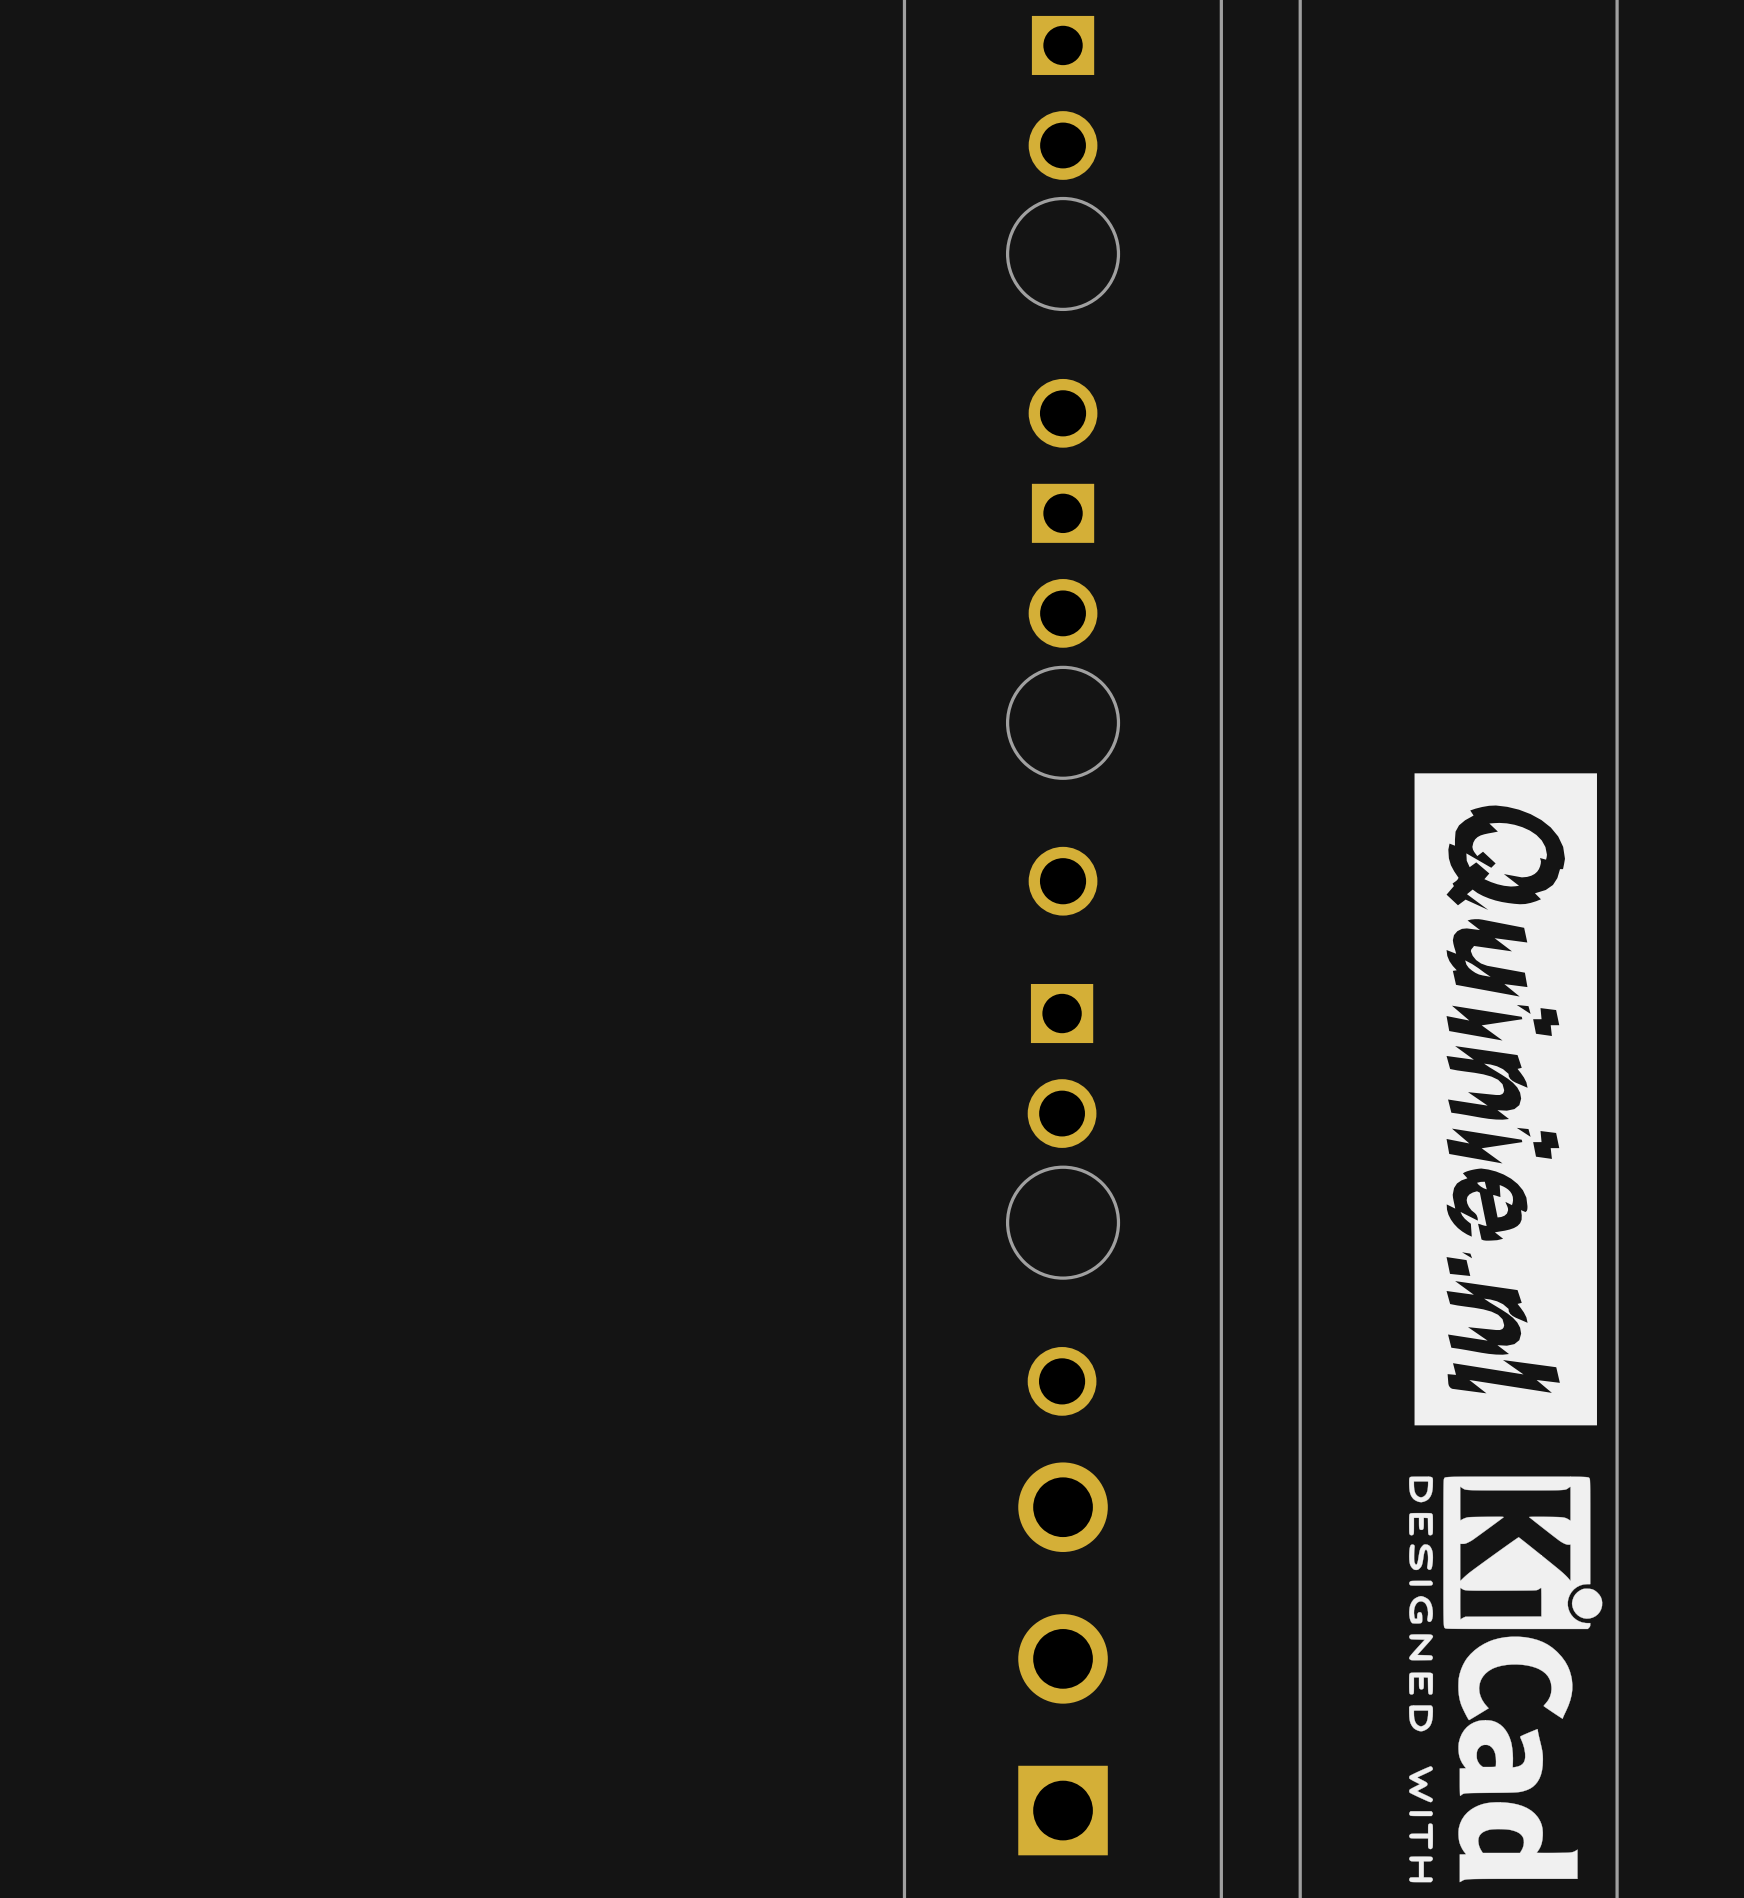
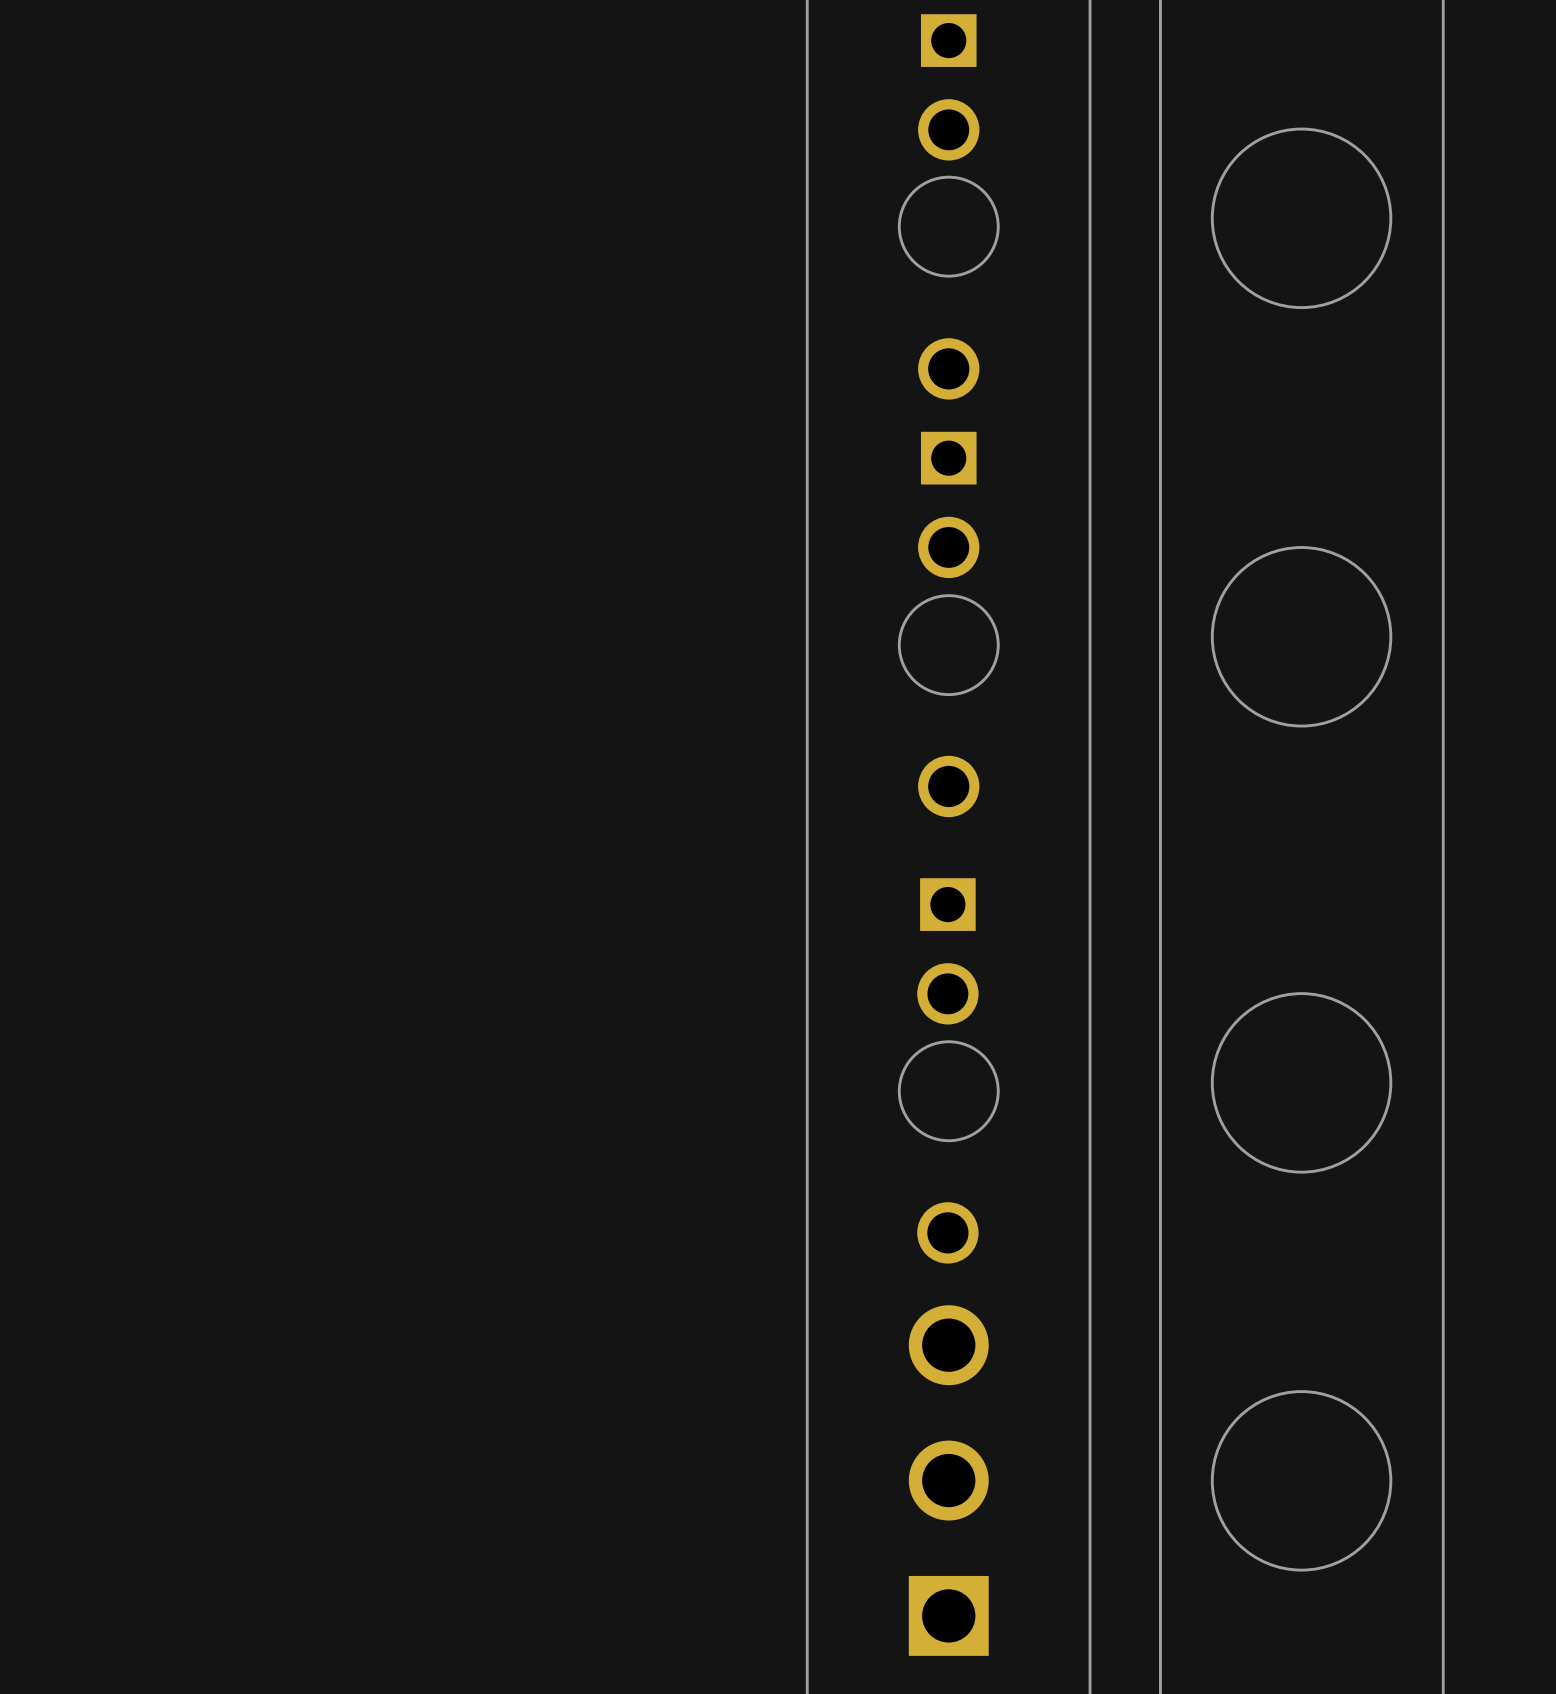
round board edge: none -> [1210, 127, 1393, 310]
round board edge: none -> [1210, 546, 1393, 728]
drawing: [1414, 773, 1597, 1426] -> none
round board edge: none -> [1210, 992, 1393, 1174]
drawing: [1409, 1476, 1603, 1883] -> none
round board edge: none -> [1210, 1390, 1393, 1572]

